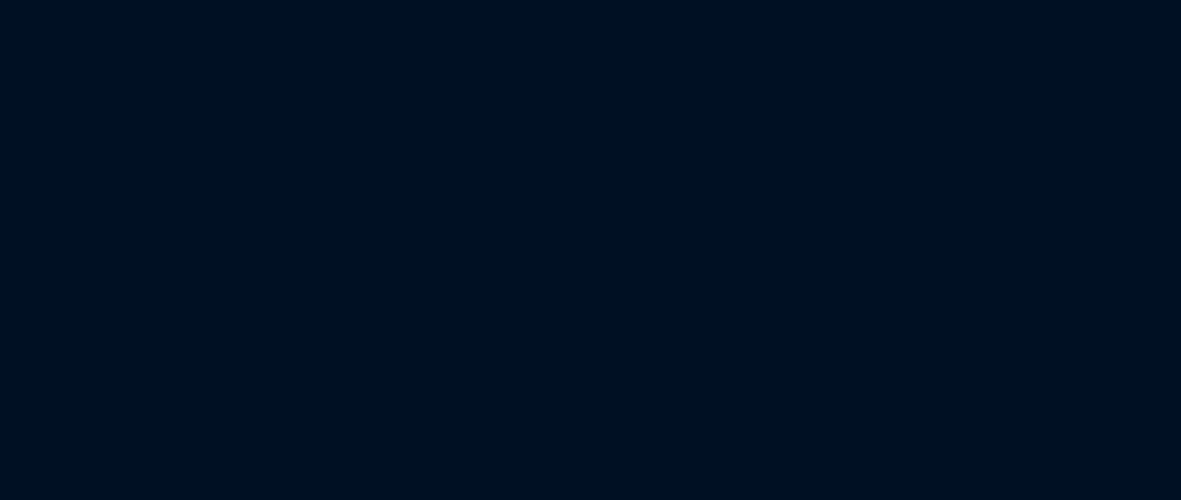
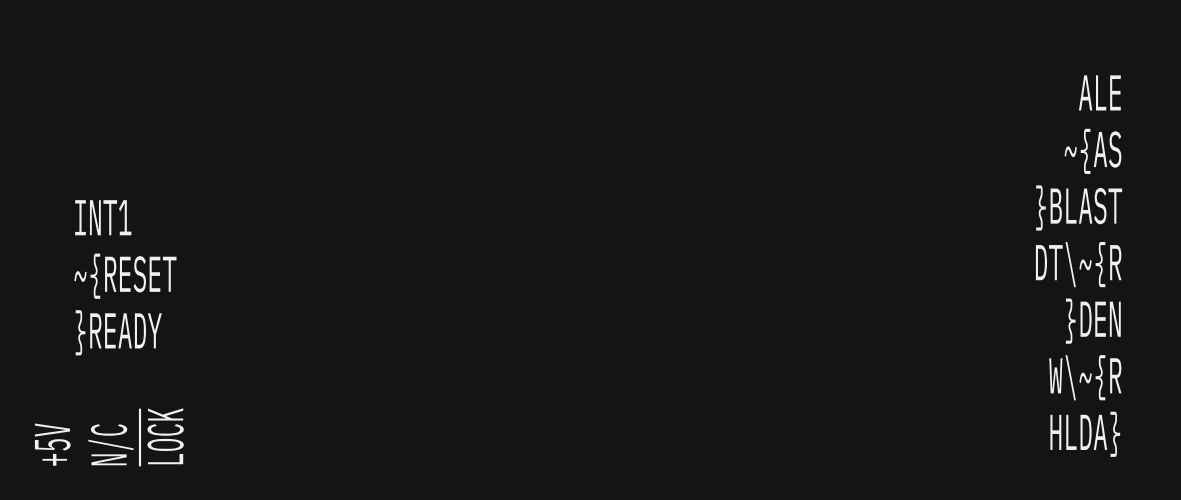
text: none -> ALE (1099, 92)
text: none -> ~{AS (1092, 151)
text: none -> }BLAST (1079, 207)
text: none -> INT1 (103, 217)
text: none -> DT\~{R (1078, 264)
text: none -> ~{RESET (125, 276)
text: none -> }DEN (1093, 321)
text: none -> }READY (118, 332)
text: none -> W\~{R (1085, 377)
text: none -> ~{LOCK} (161, 436)
text: none -> HLDA} (1085, 434)
text: none -> +5V (52, 444)
text: none -> N/C (110, 444)

